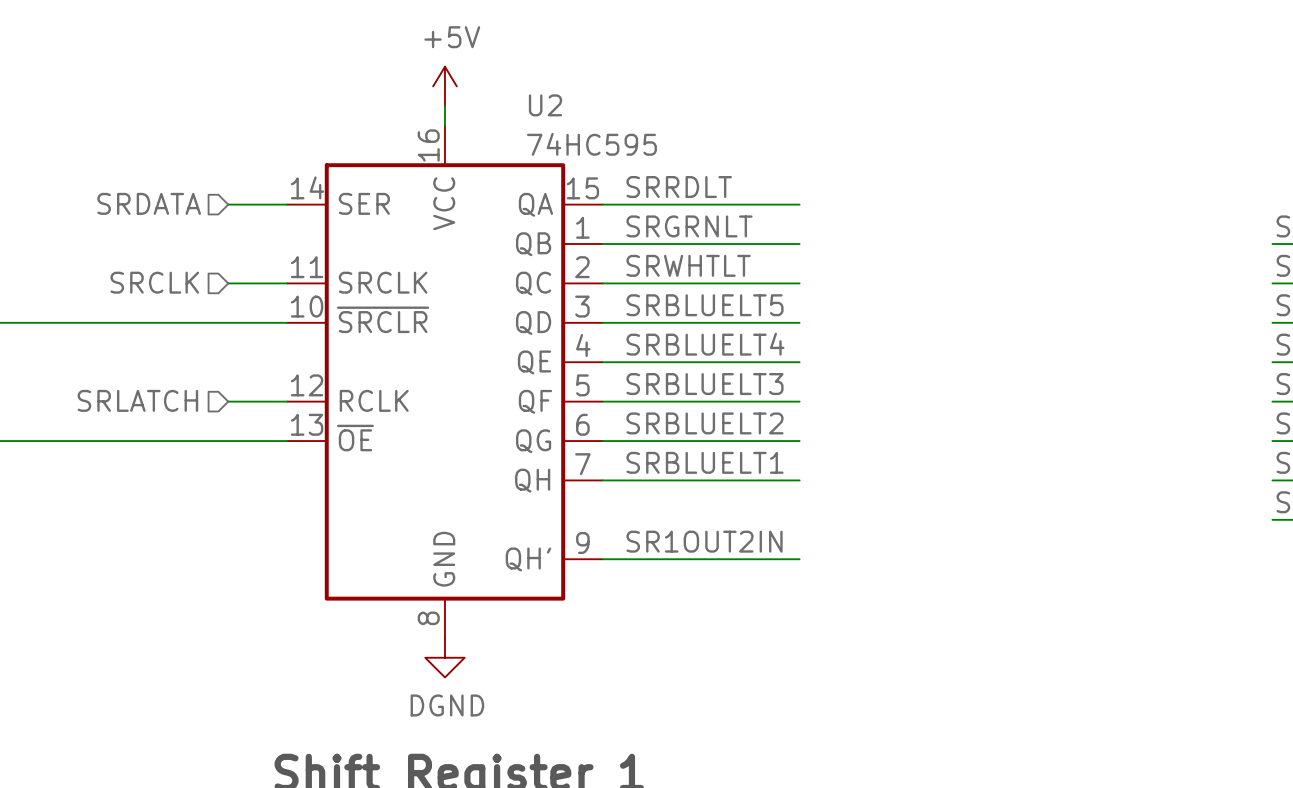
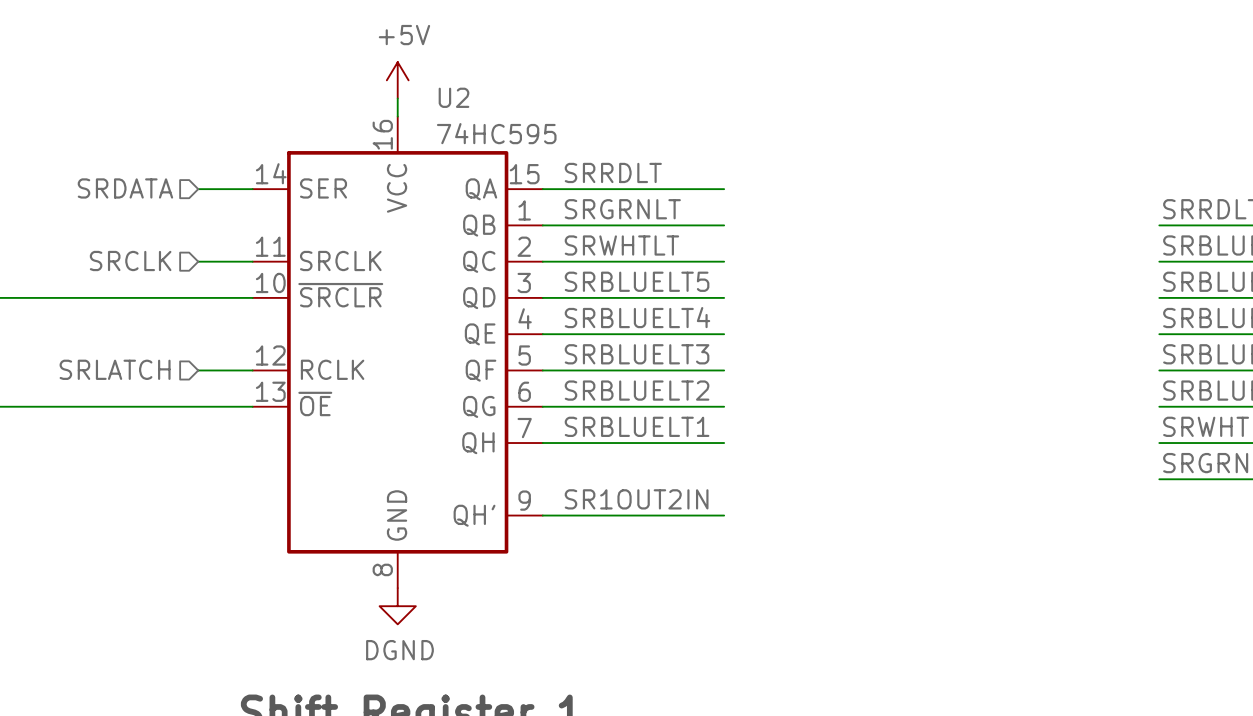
U2 name position: U2 (545, 105) -> U2 (453, 97)
U2 value position: 74HC595 (591, 144) -> 74HC595 (496, 133)

